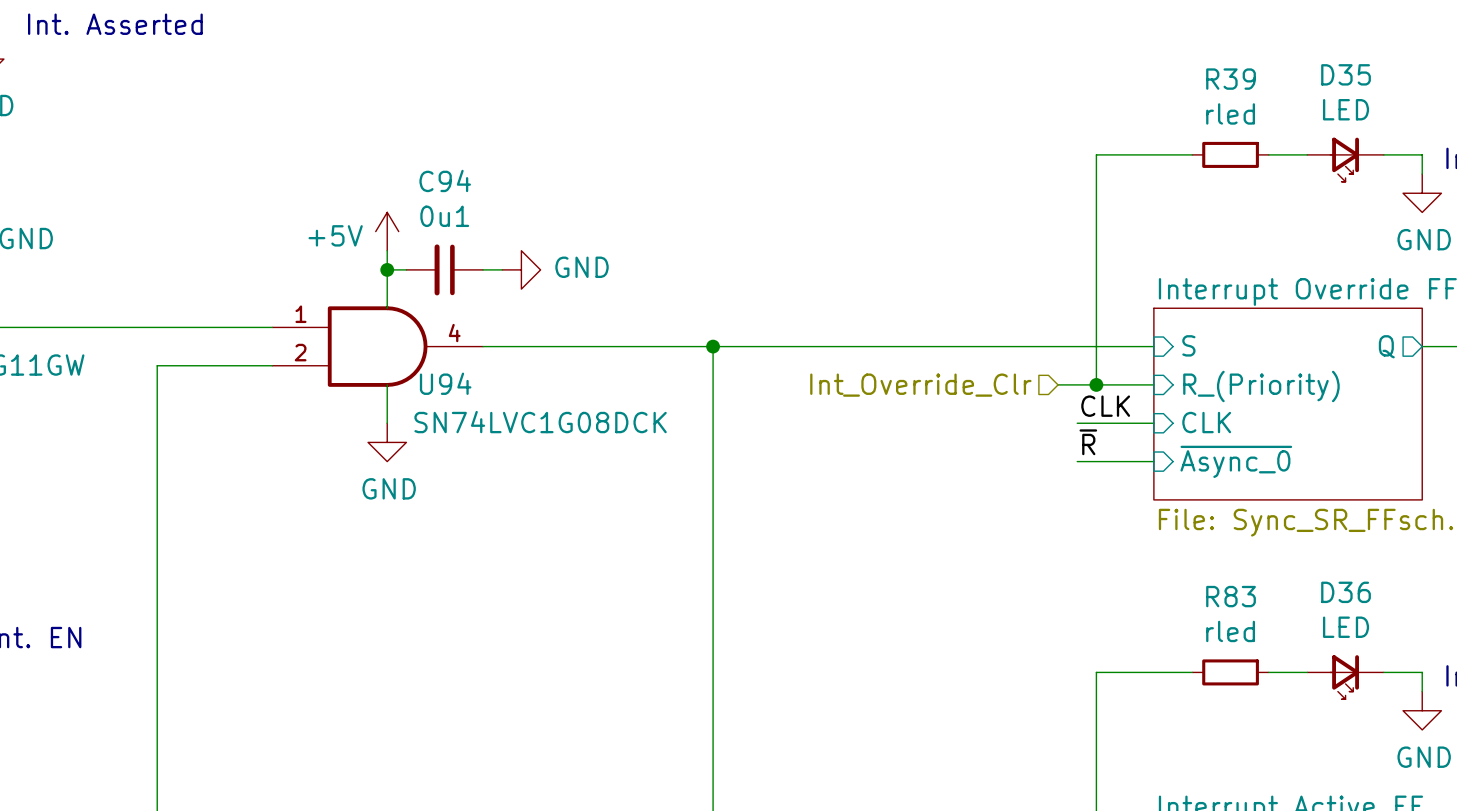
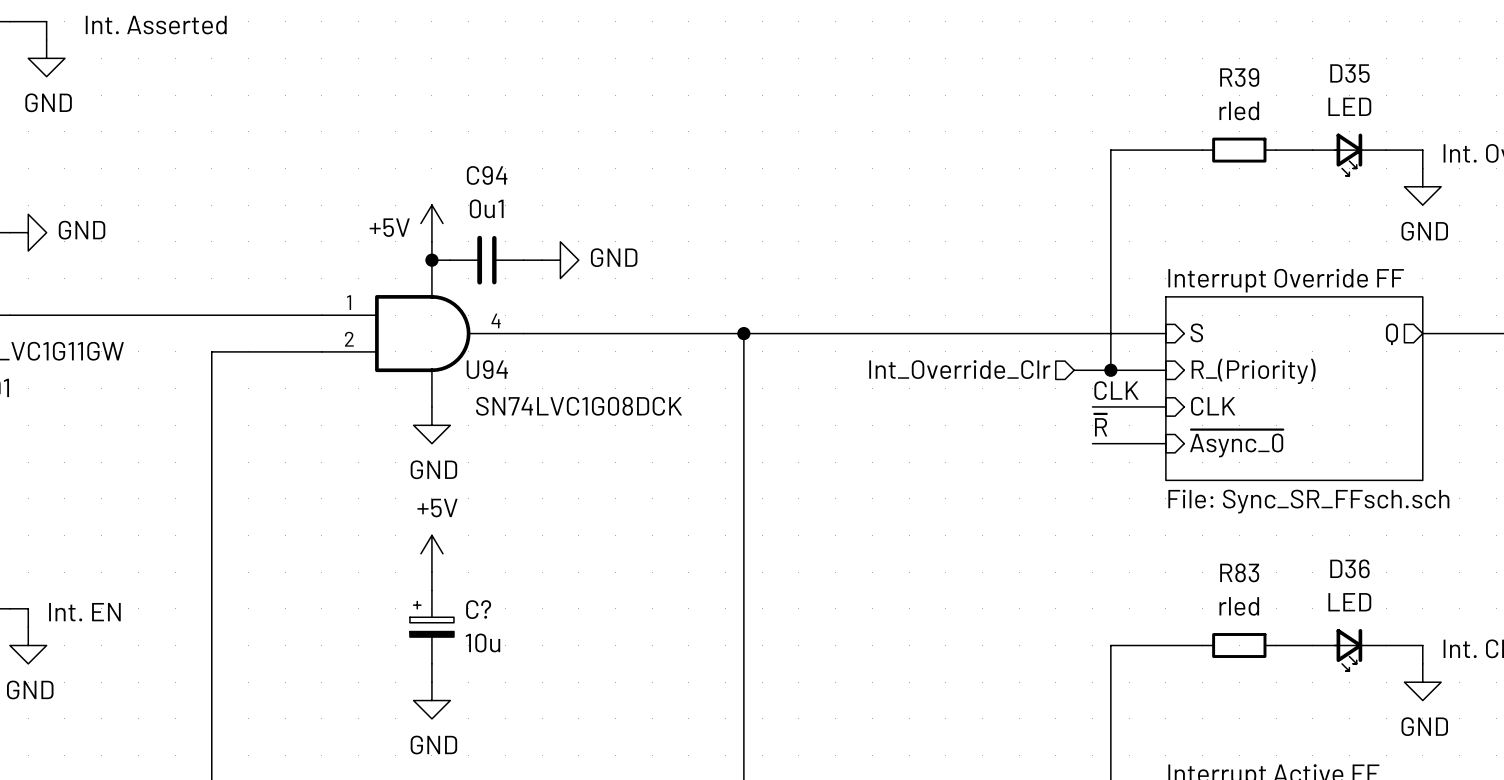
power symbol: none -> +5V (431, 553)
wire: none -> (431, 572) (431, 590)
C?: none -> 10u (431, 627)
wire: none -> (431, 663) (431, 682)
power symbol: none -> GND (431, 700)

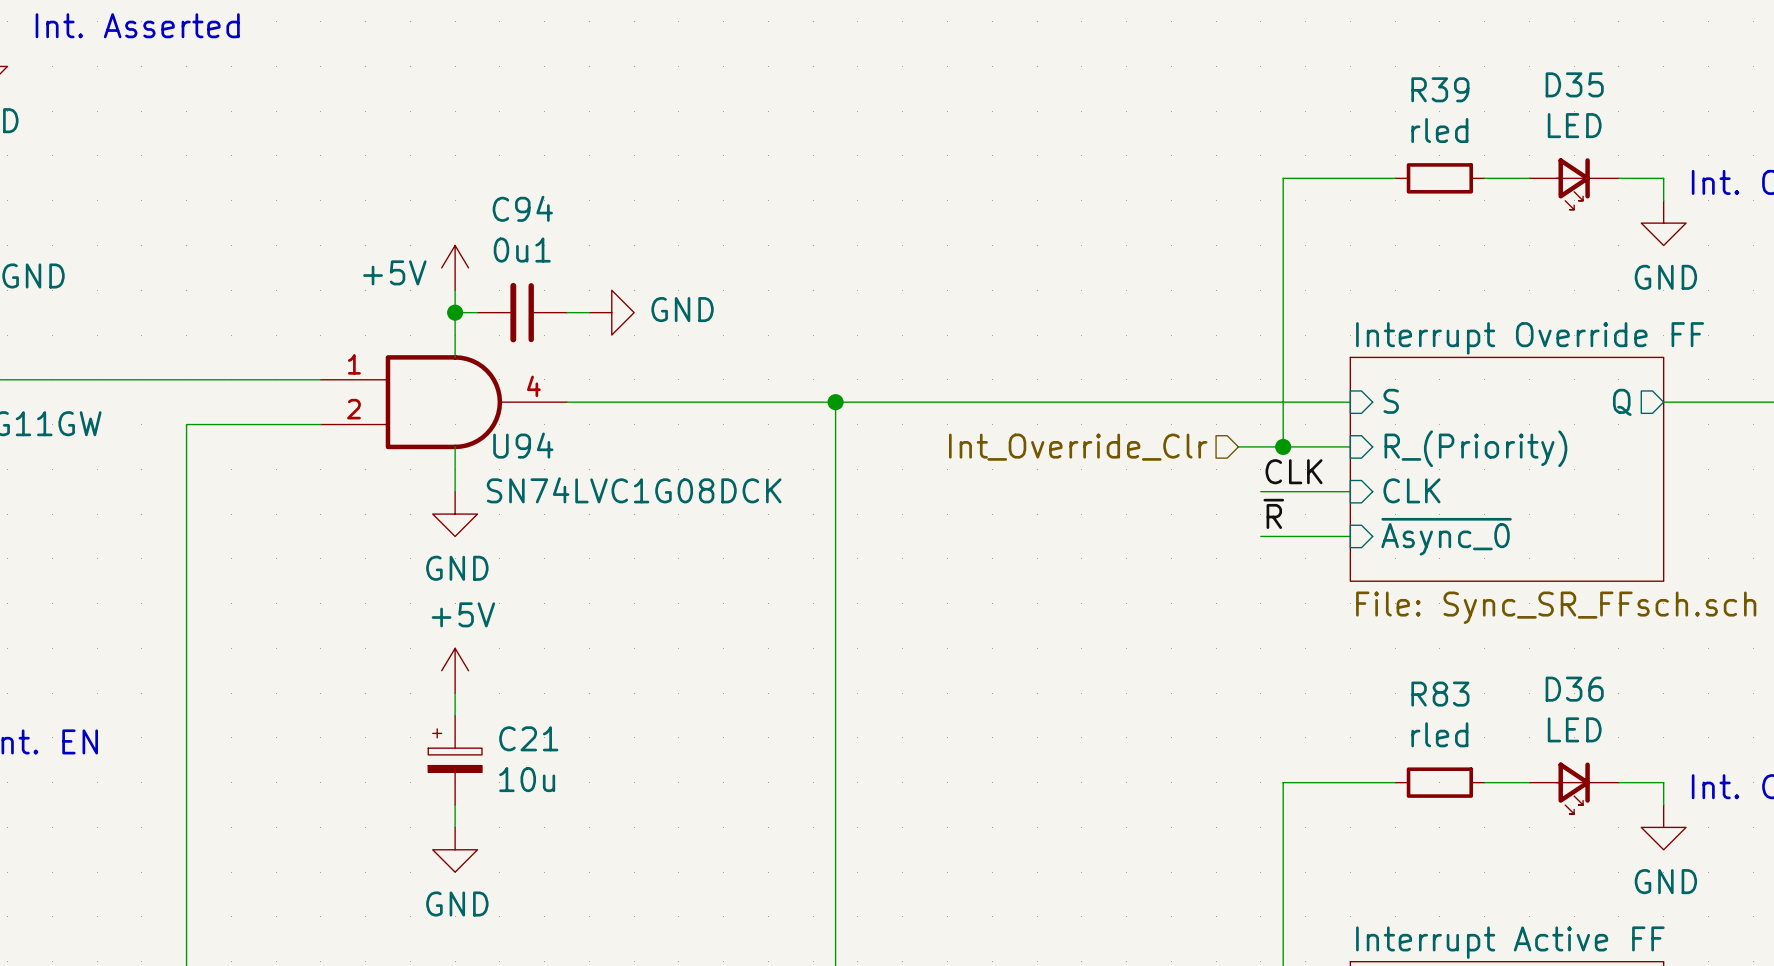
C? name: C? (478, 609) -> C21 (528, 738)

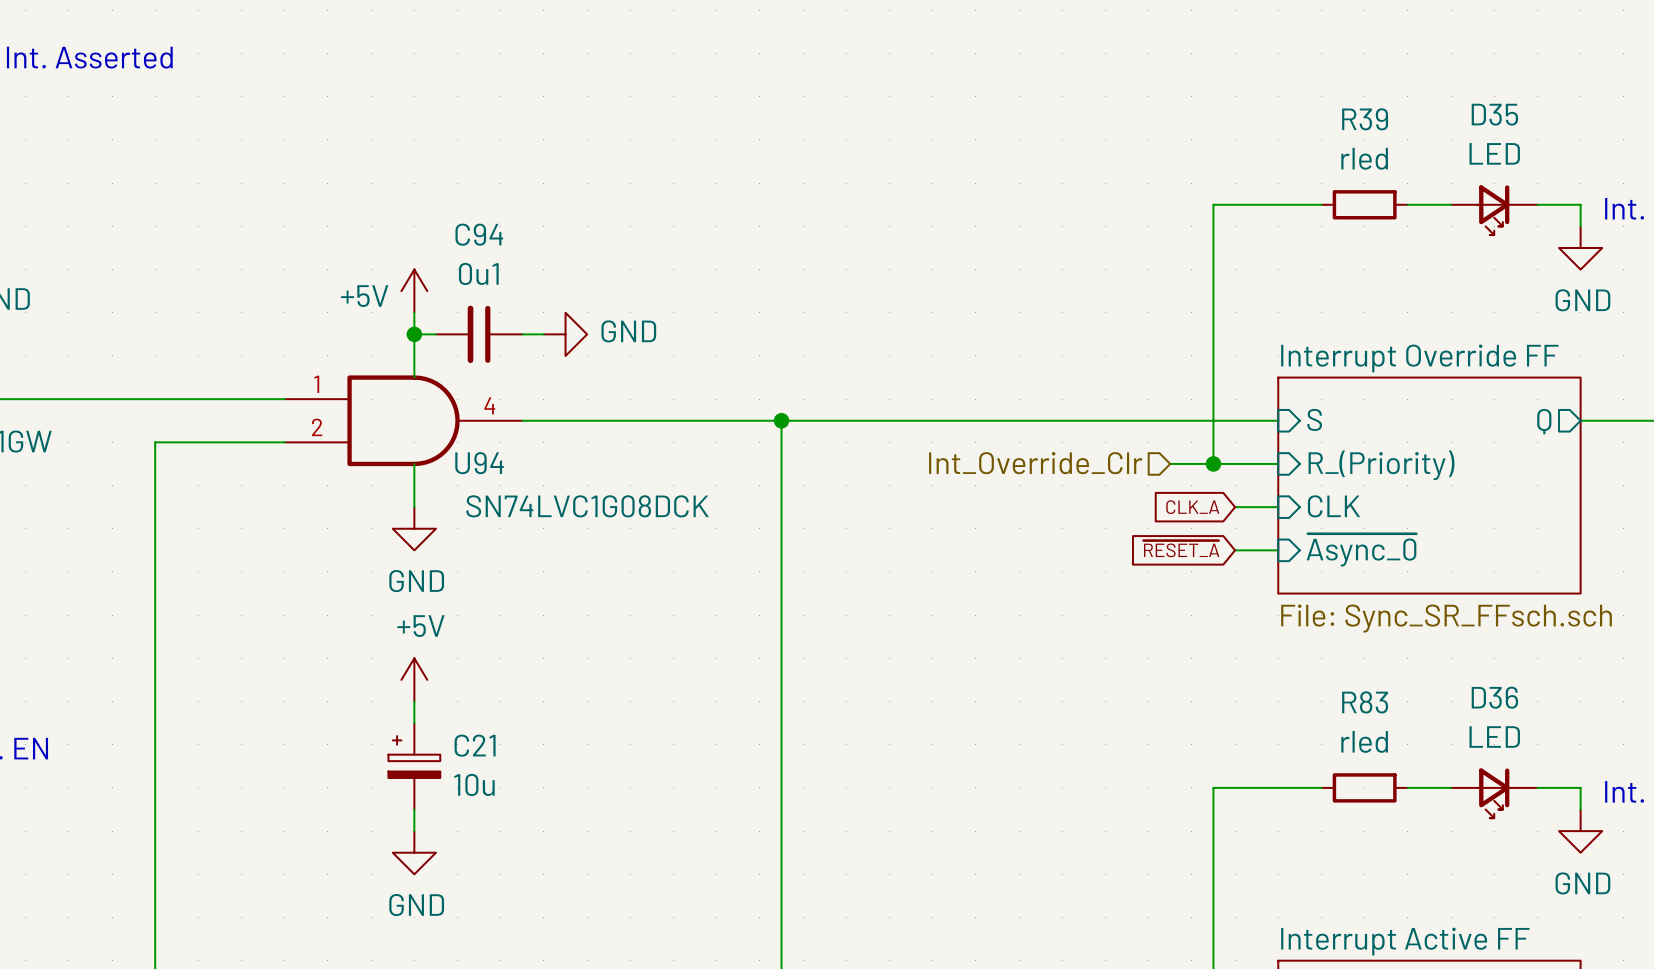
label: CLK (1294, 471) -> none
wire: (1260, 491) (1305, 491) -> none
global label: none -> CLK_A (1192, 507)
label: ~{R} (1273, 513) -> none
global label: none -> ~{RESET_A} (1181, 548)
wire: (1260, 536) (1305, 536) -> none

